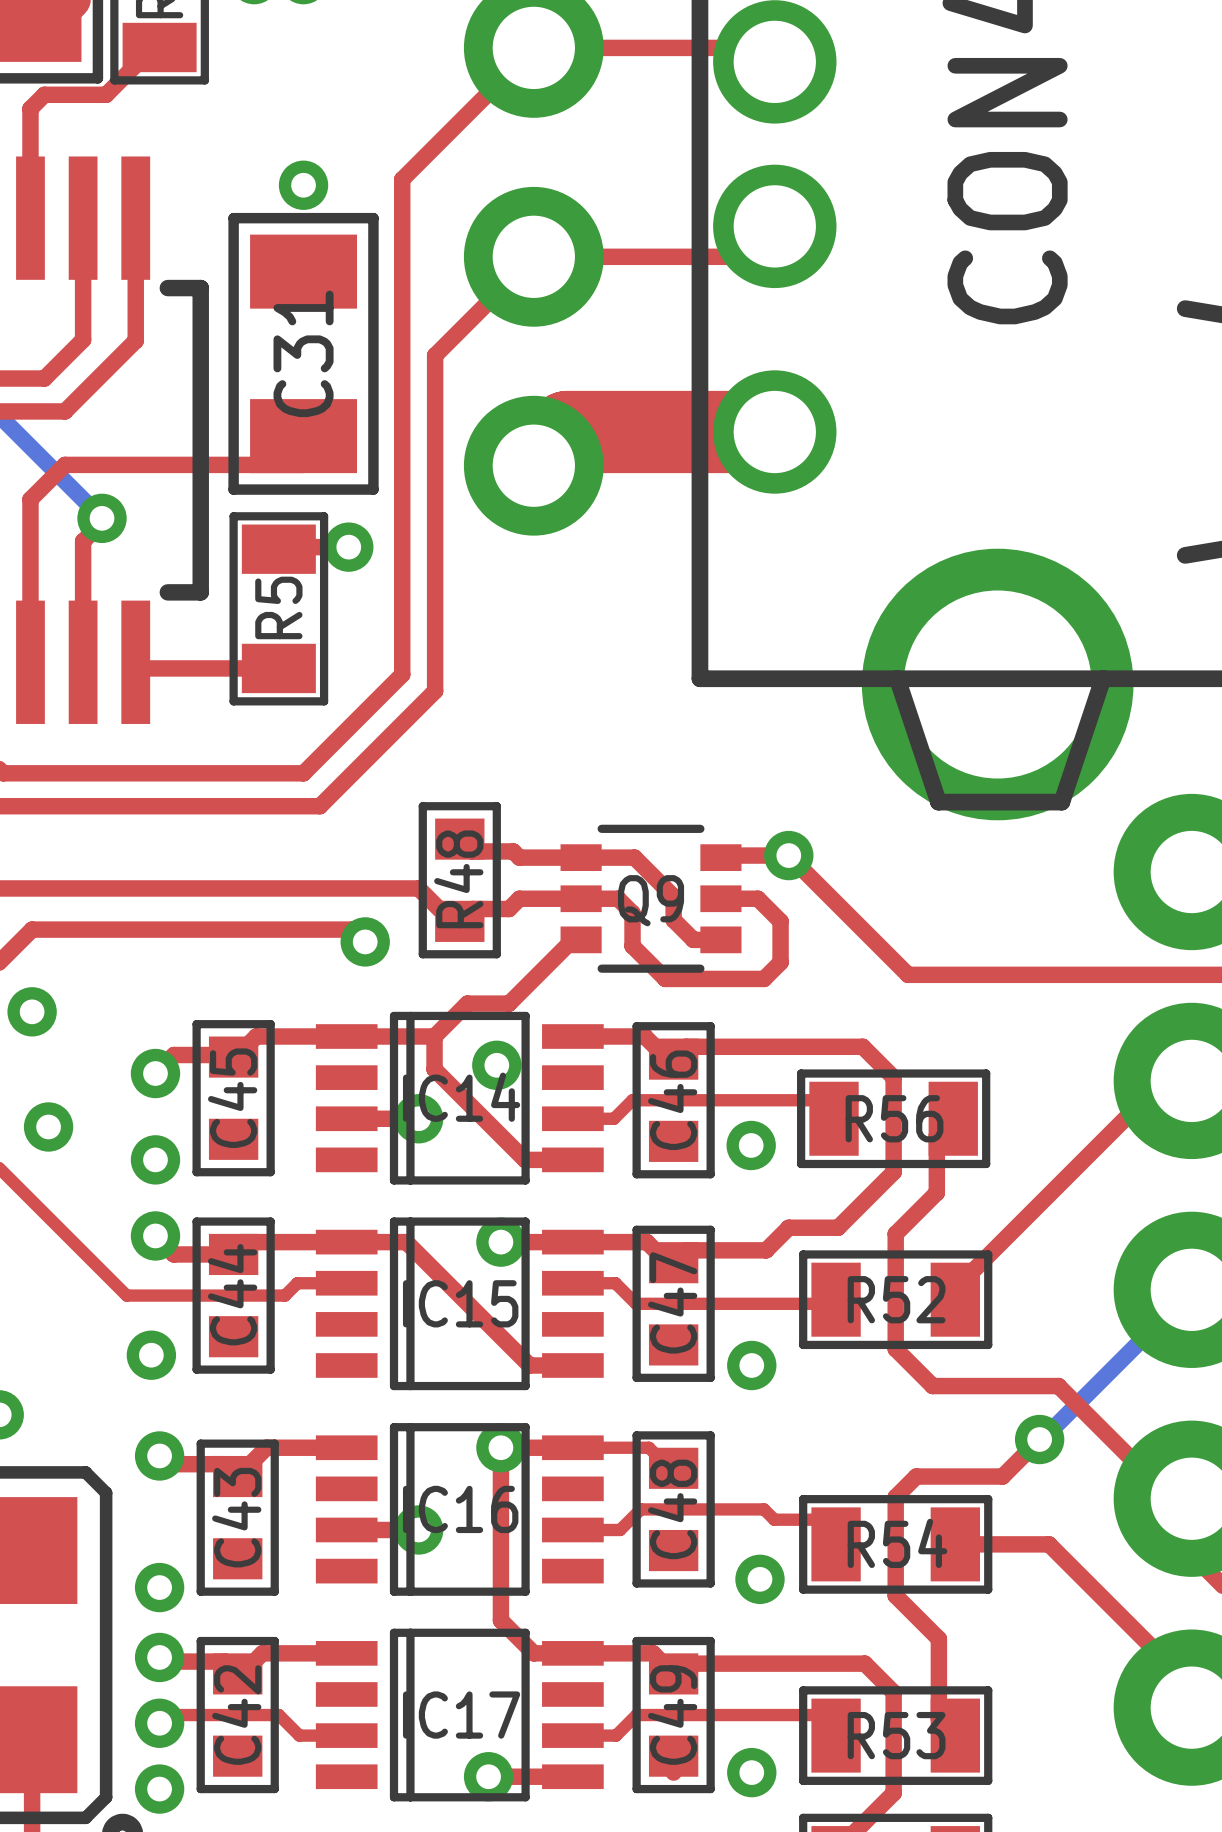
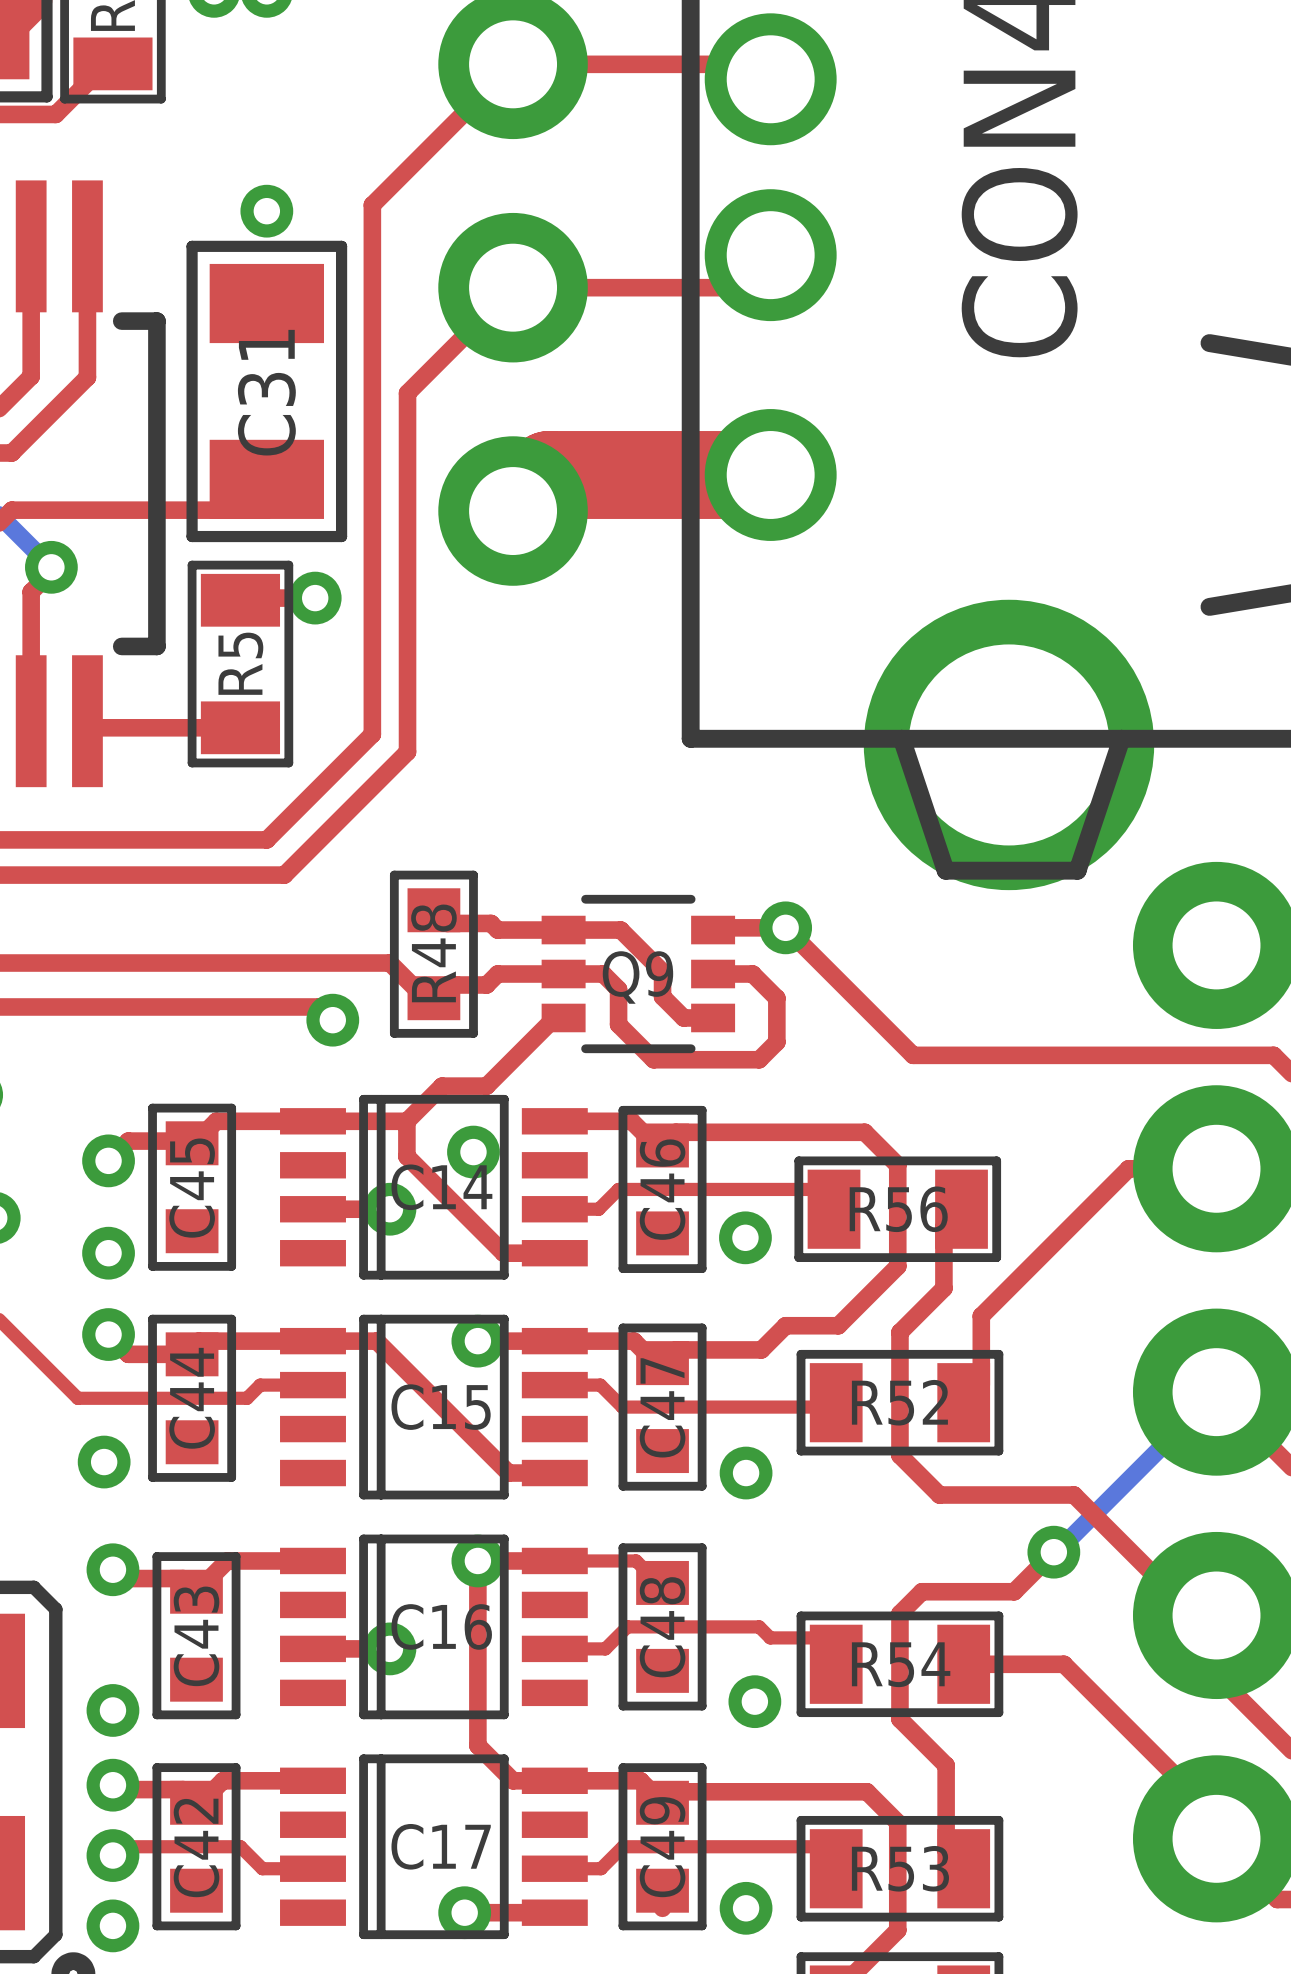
top track: (1163, 1080) (971, 1272) -> (1185, 1168) (1128, 1168) (981, 1316) (981, 1373)

